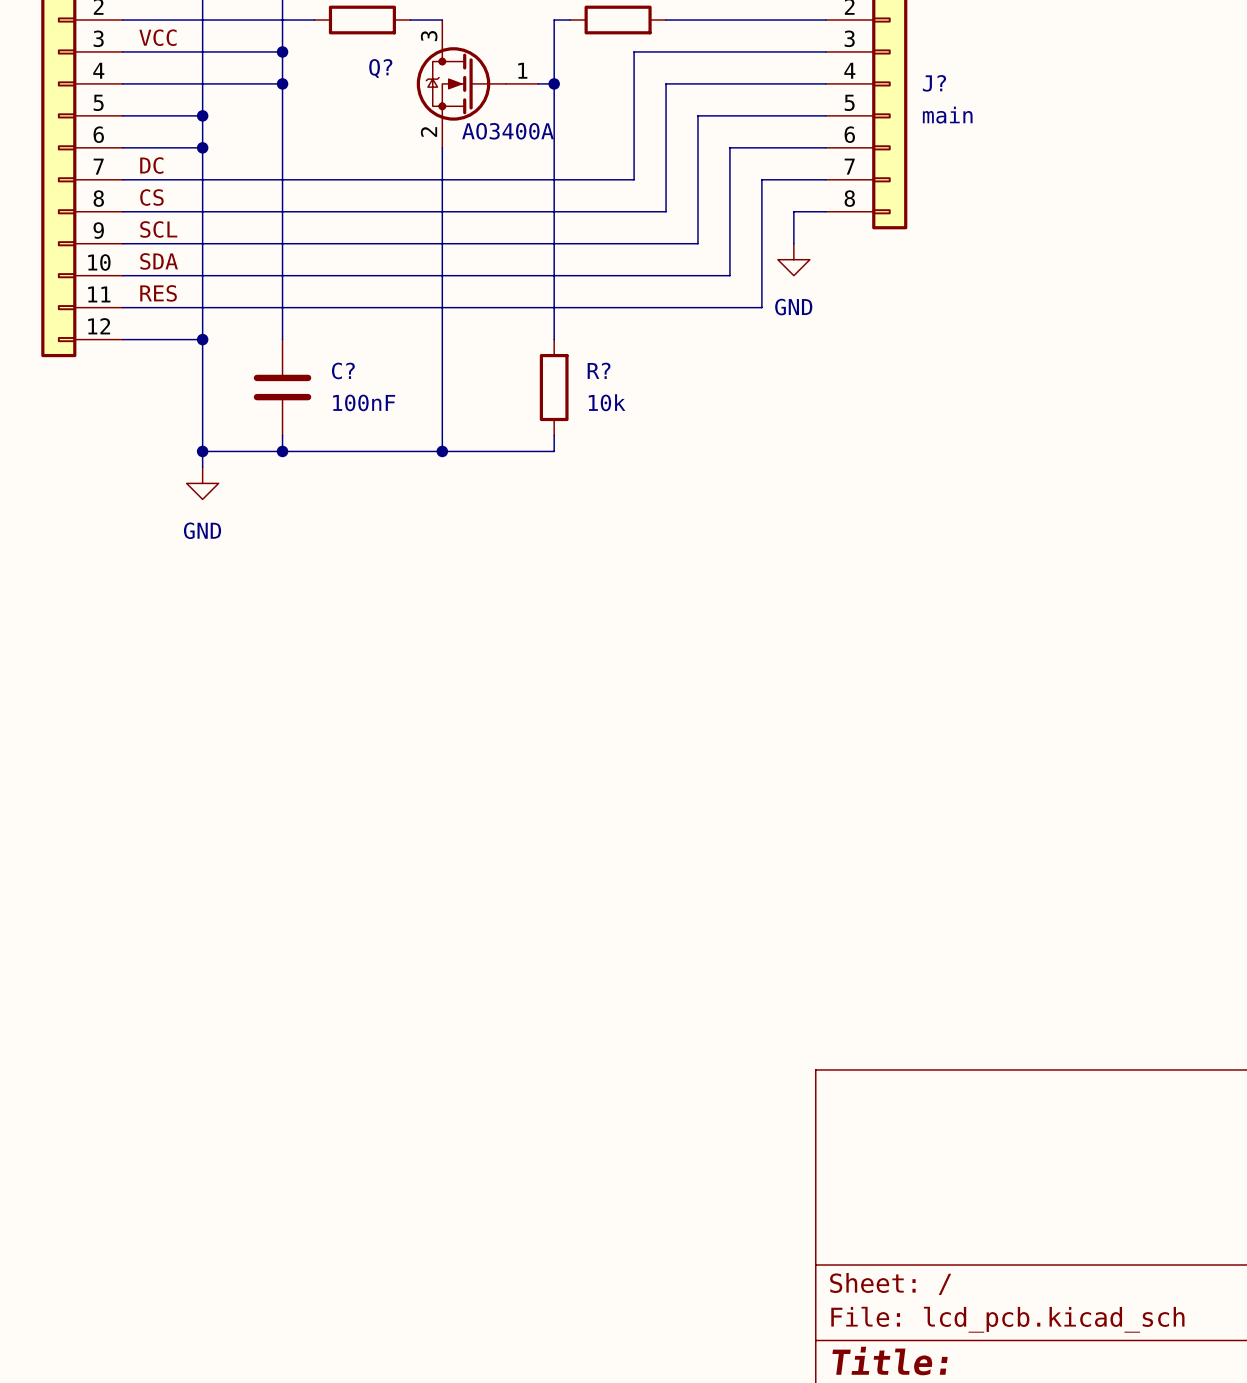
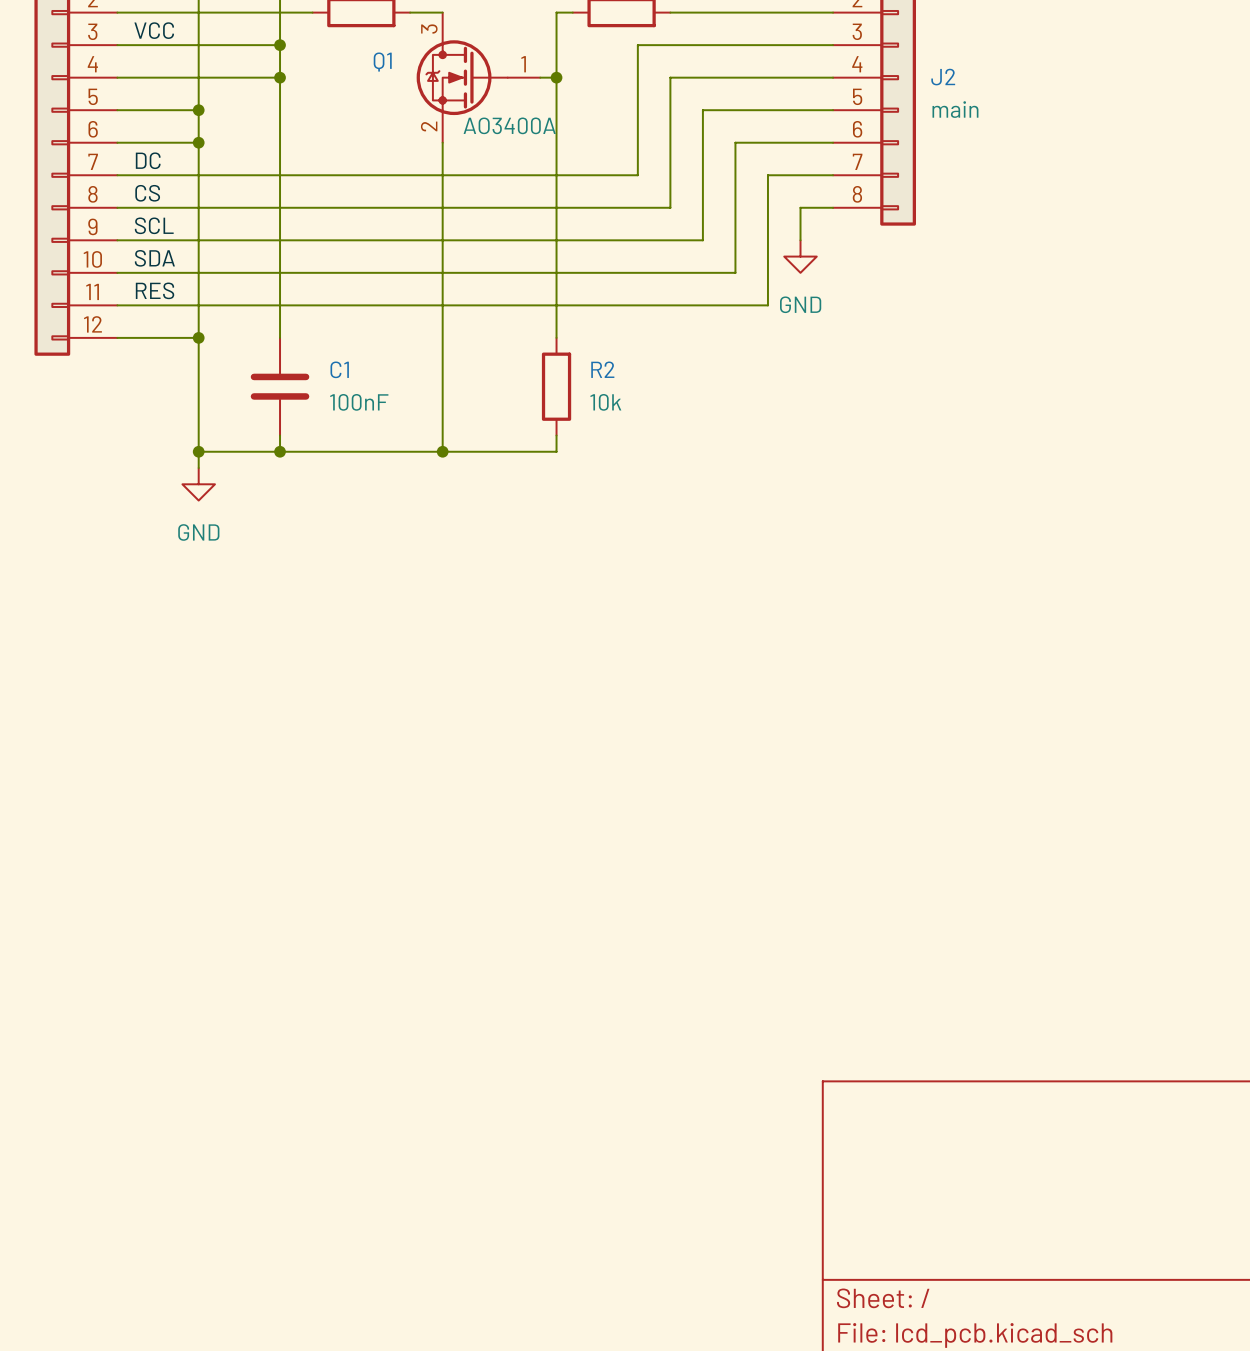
Q? name: Q? (380, 68) -> Q1 (382, 62)
J? name: J? (934, 83) -> J2 (943, 77)
C? name: C? (343, 370) -> C1 (339, 369)
R? name: R? (599, 370) -> R2 (602, 369)

